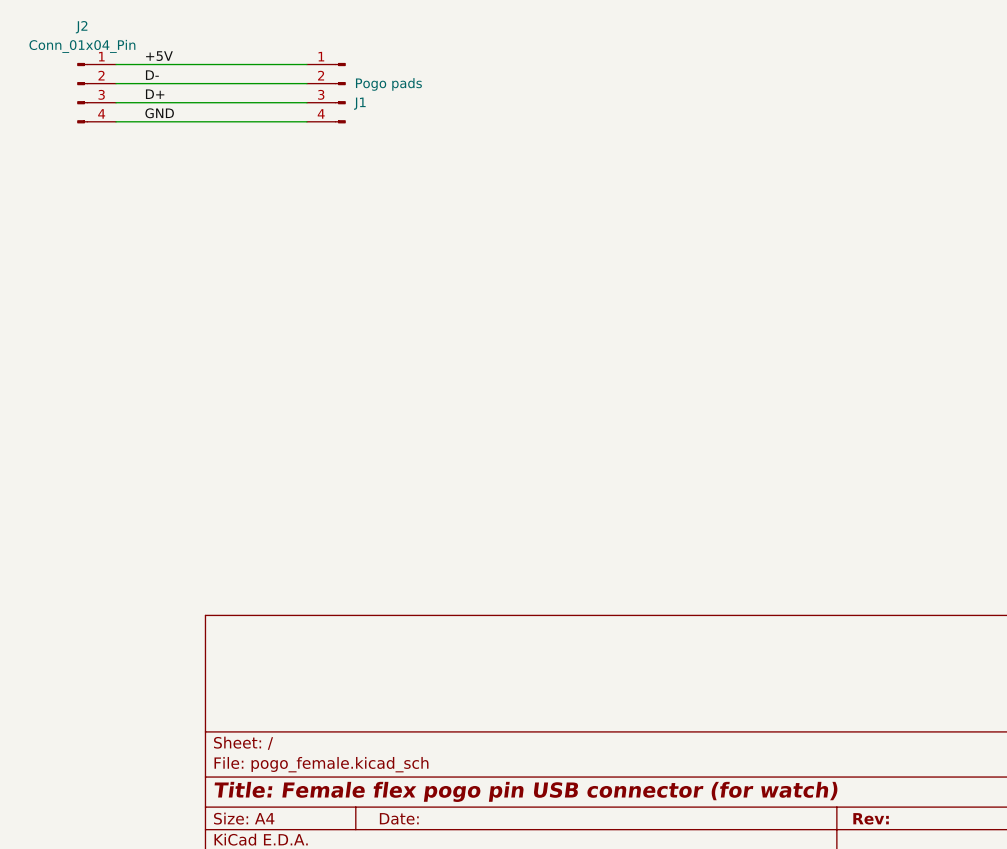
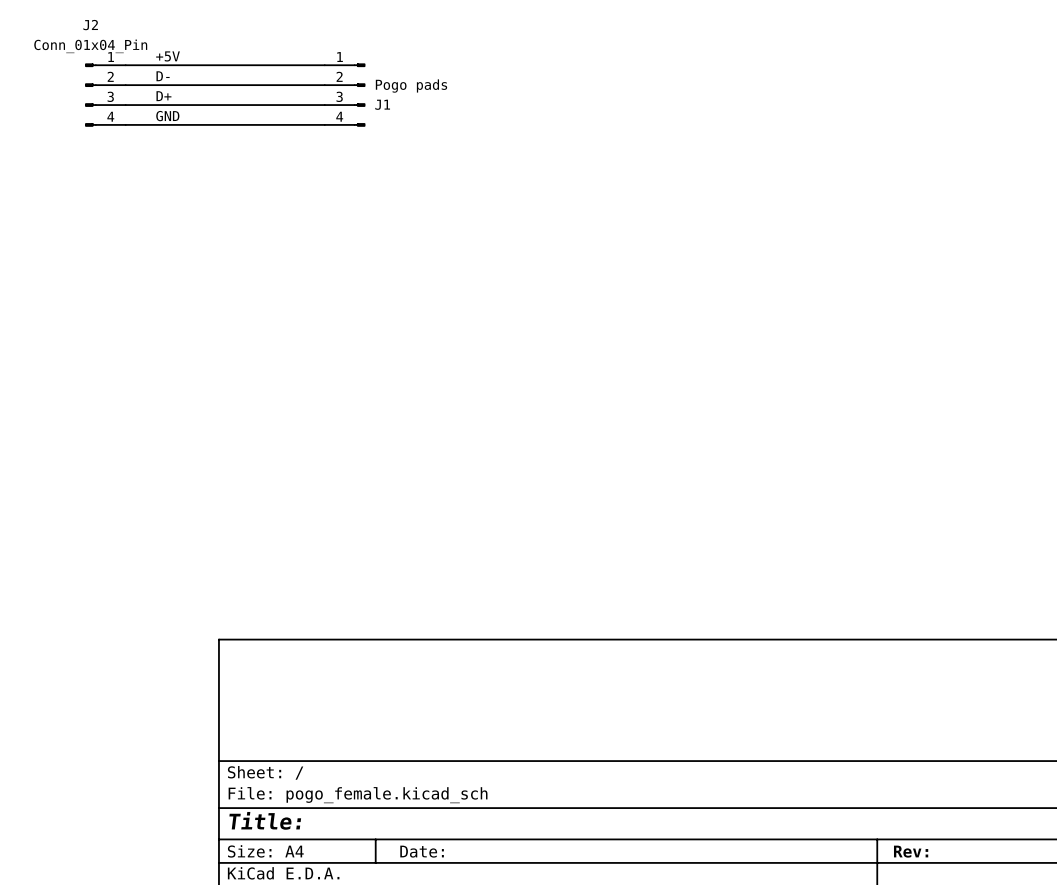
title block: Title: Female flex pogo pin USB connector (for watch) (526, 791) -> Title: (265, 820)

